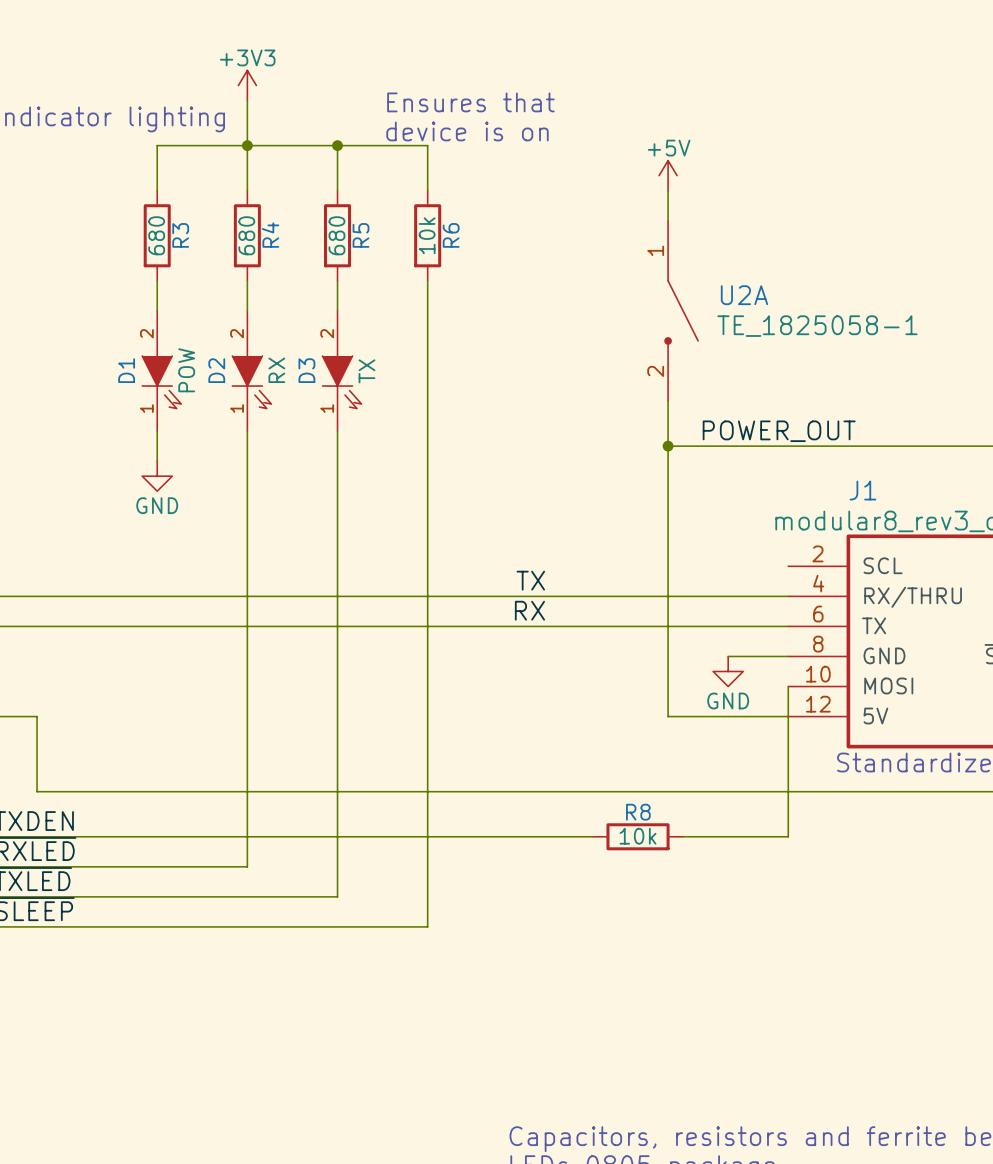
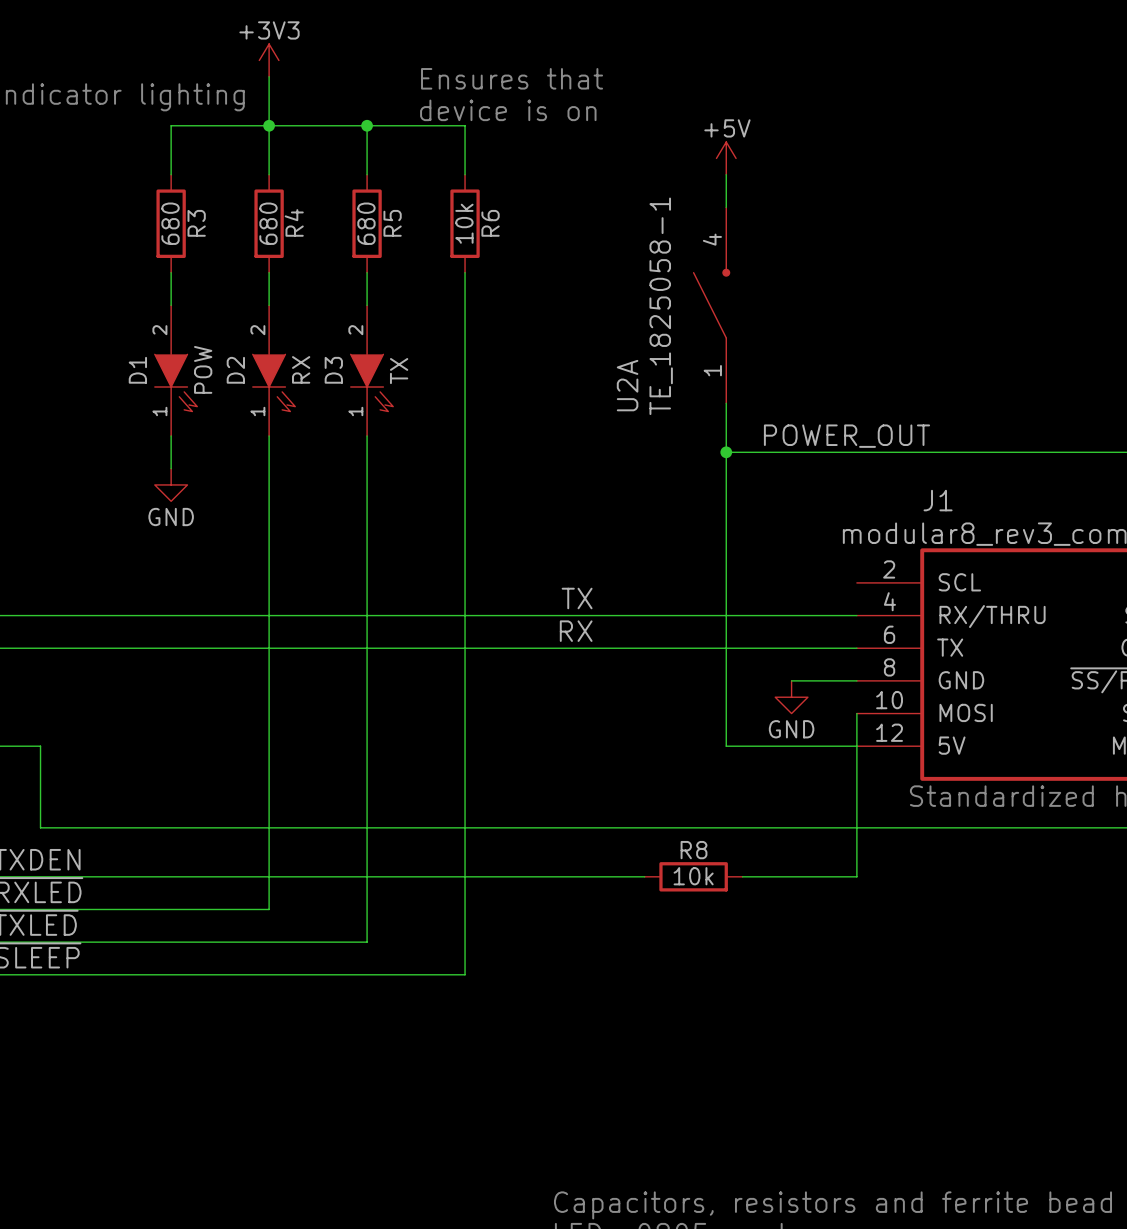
U2A symbol: [665, 220, 699, 402] -> [693, 207, 730, 404]
U2A name position: U2A (744, 295) -> U2A (627, 385)
U2A value position: TE_1825058-1 (817, 326) -> TE_1825058-1 (661, 306)

